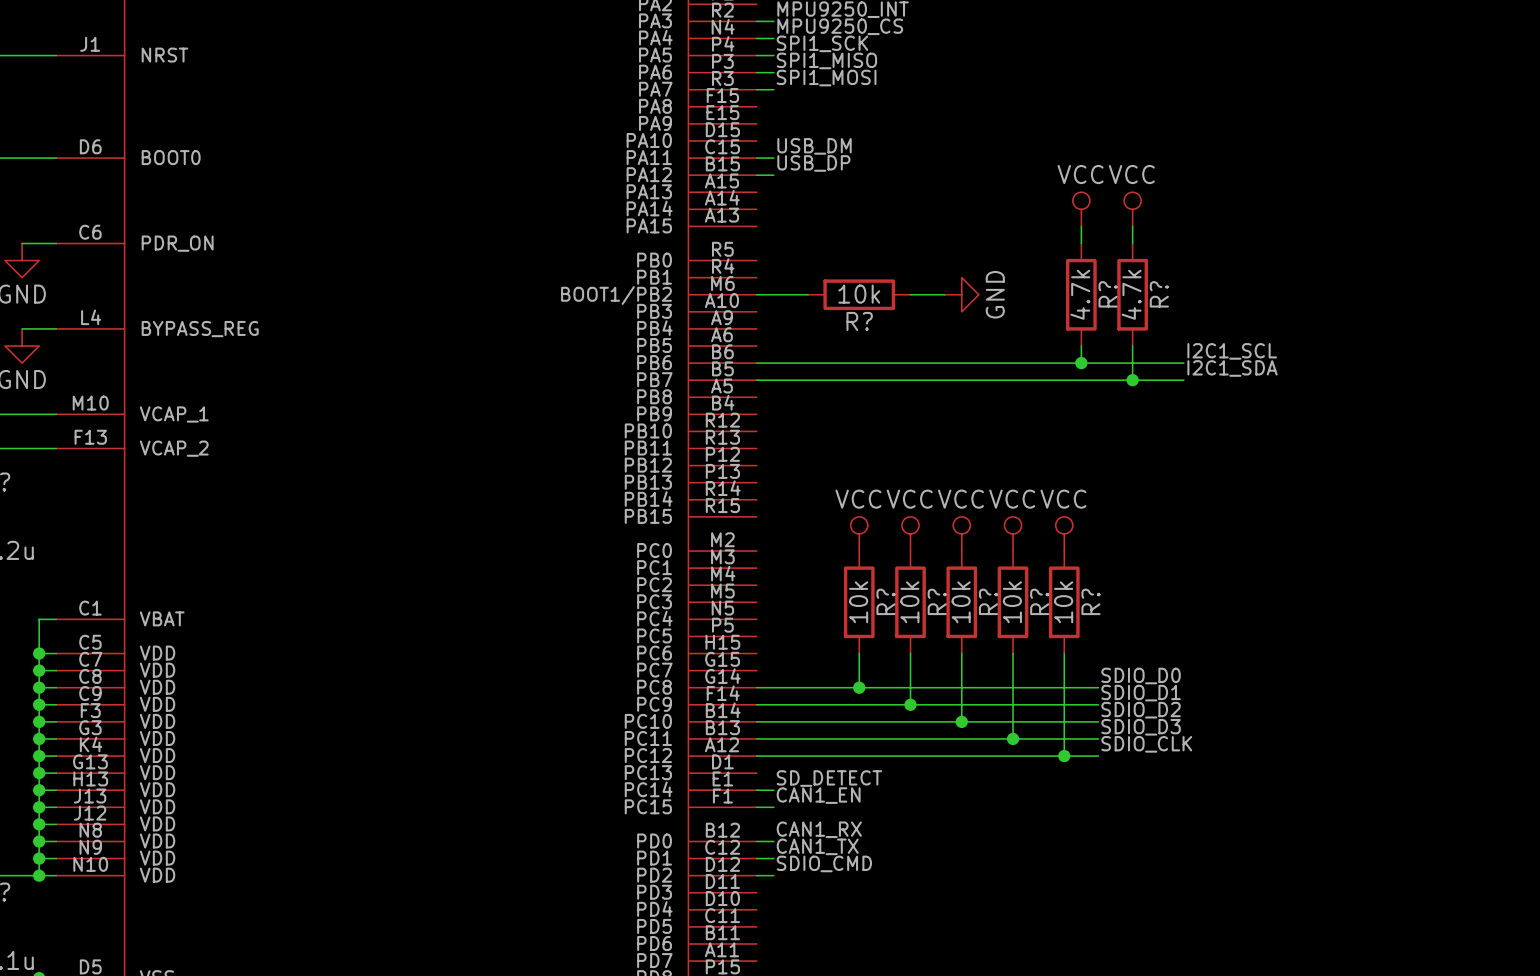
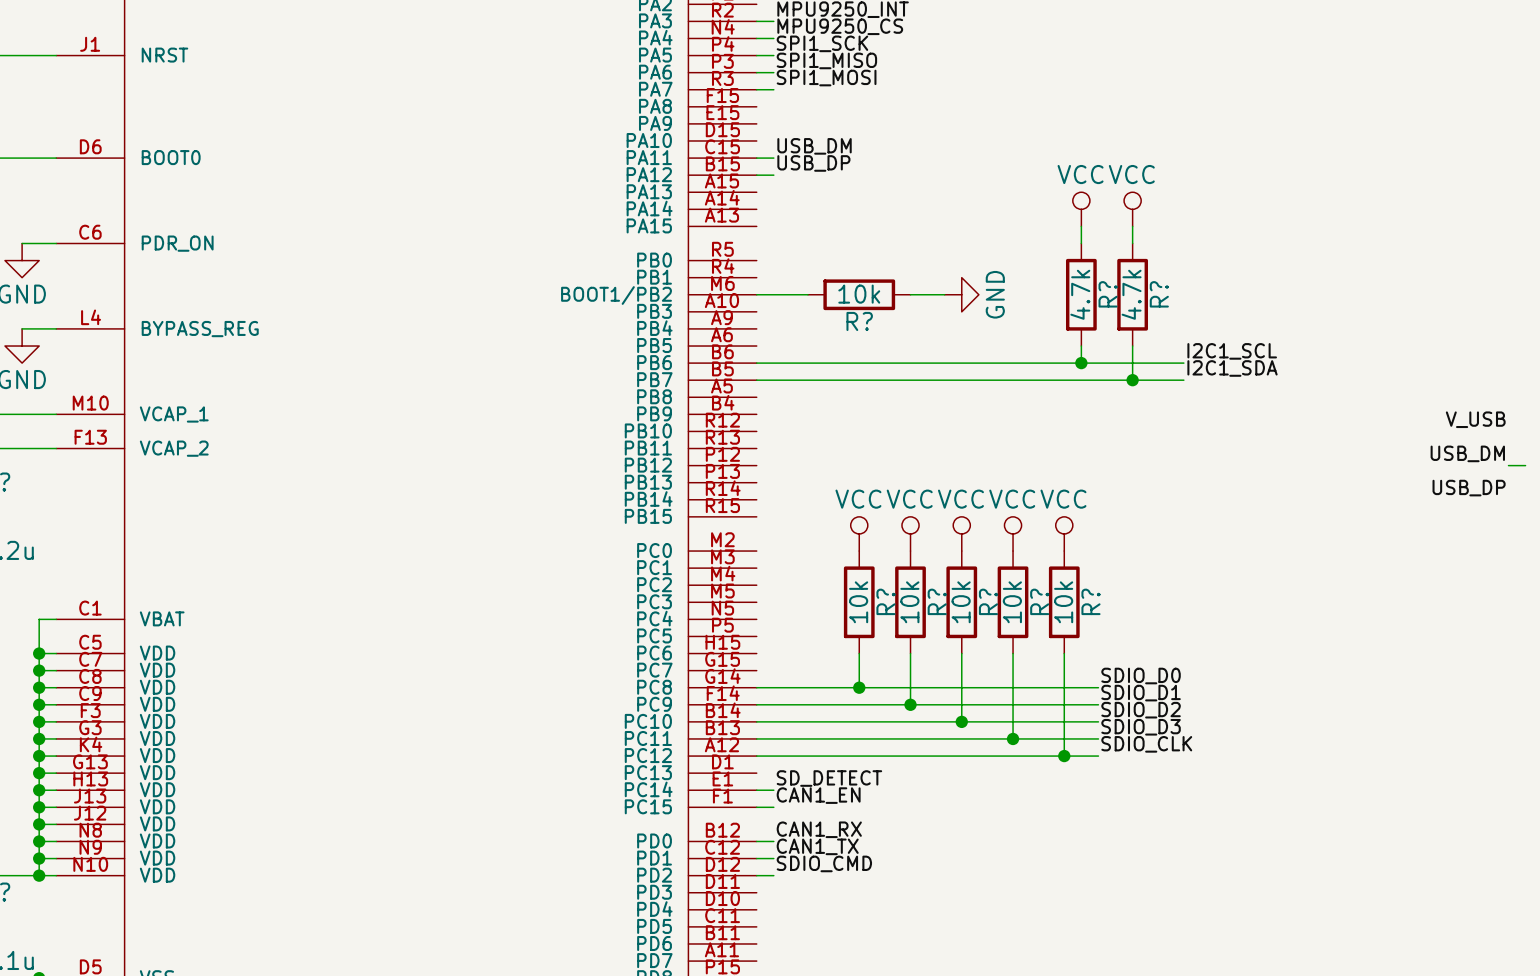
label: none -> V_USB (1475, 419)
label: none -> USB_DM (1467, 453)
wire: none -> (1508, 465) (1525, 465)
label: none -> USB_DP (1469, 488)

